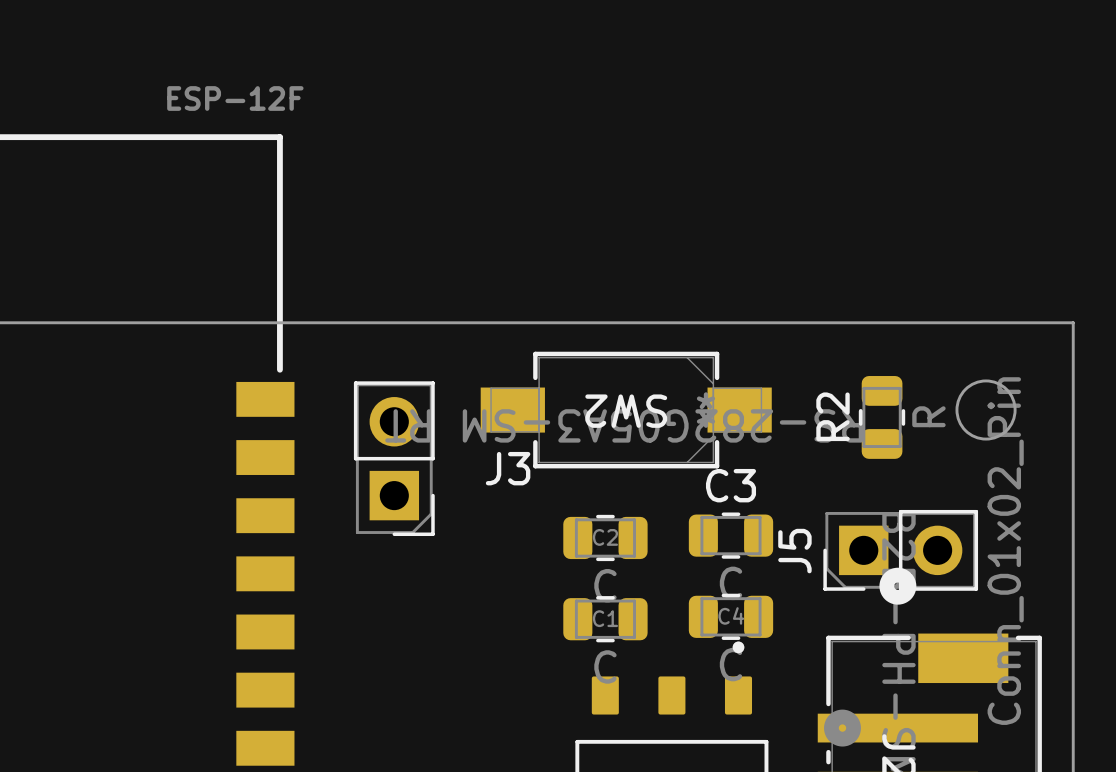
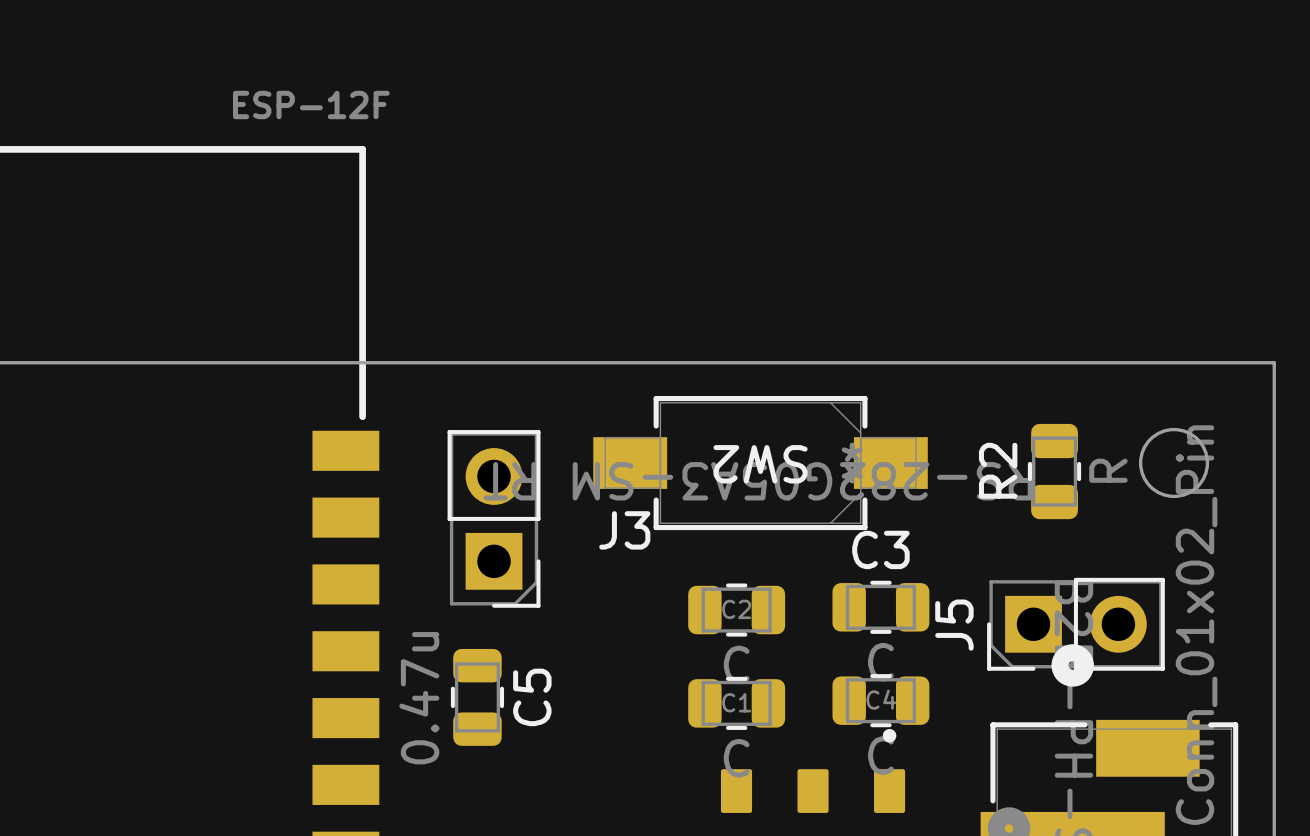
C5: none -> 0.47u (477, 697)

